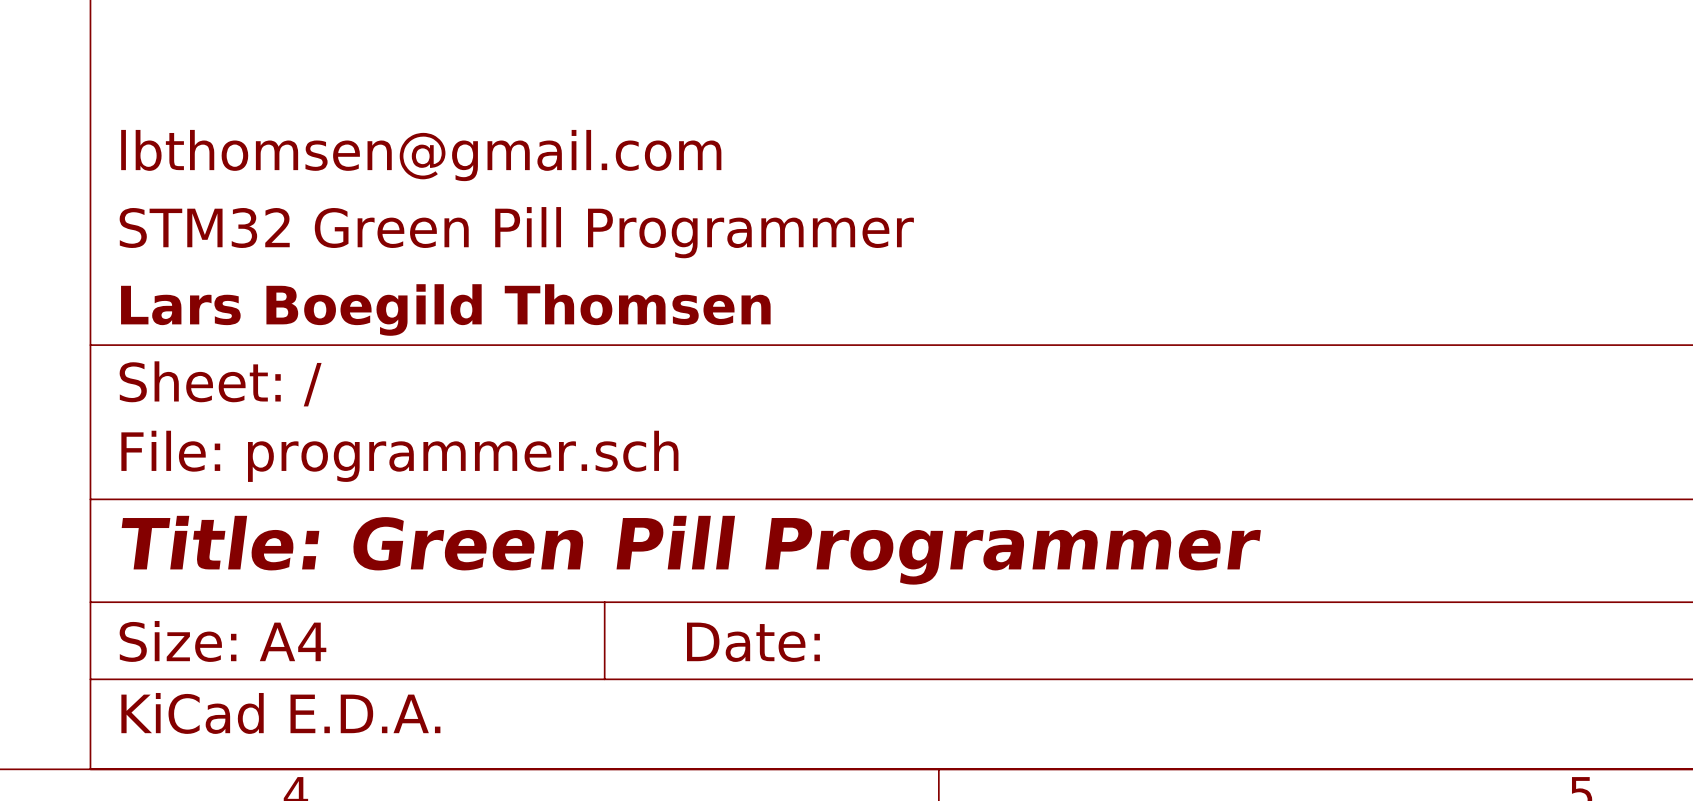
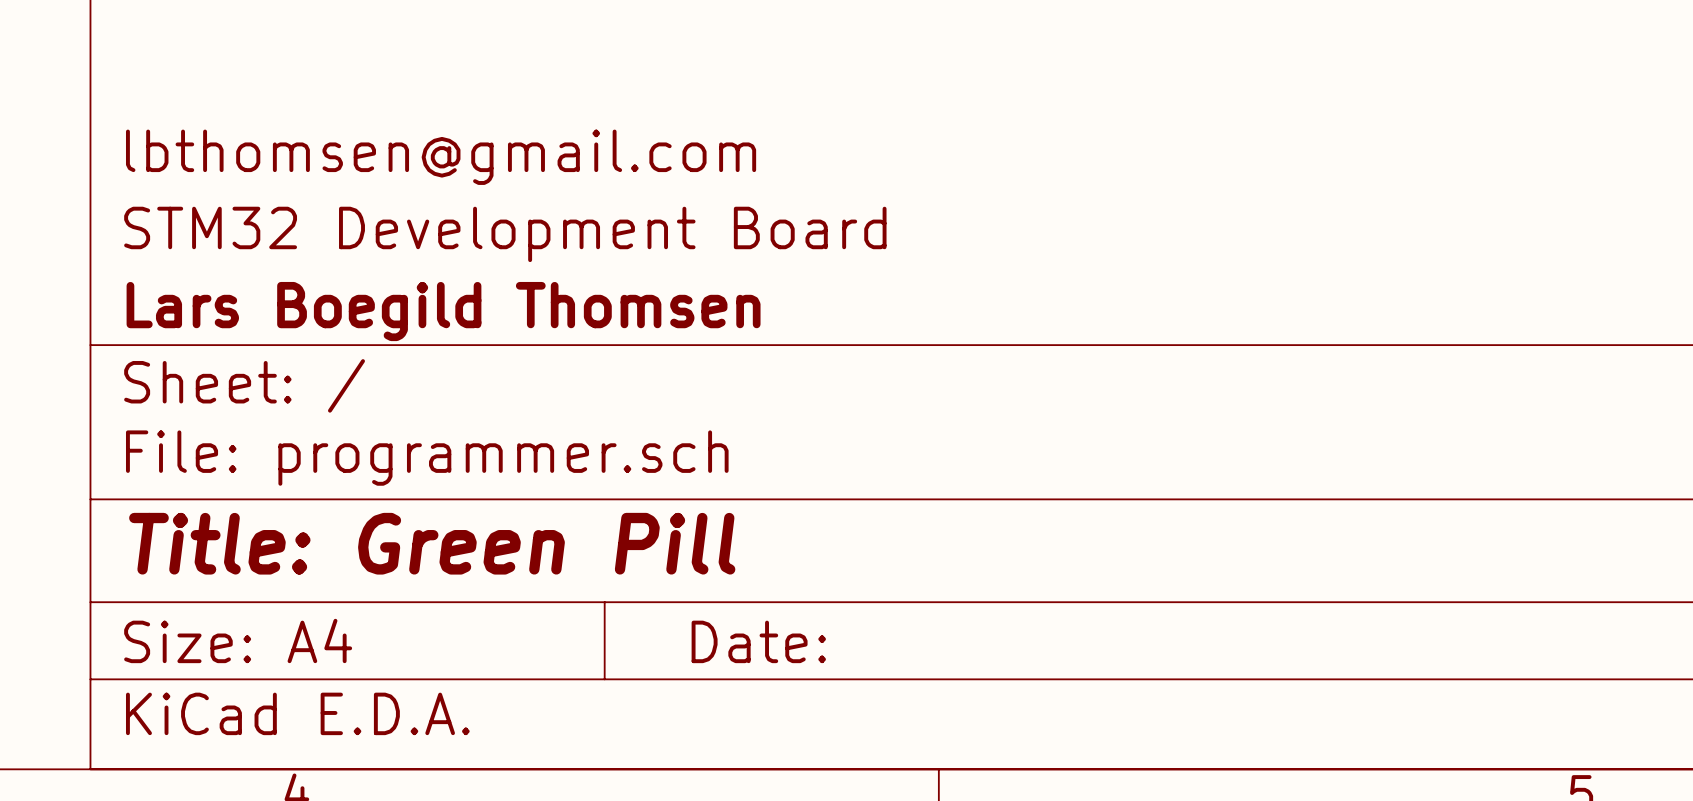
title block: STM32 Green Pill Programmer (516, 232) -> STM32 Development Board (505, 234)
title block: Title: Green Pill Programmer (691, 550) -> Title: Green Pill (432, 543)

